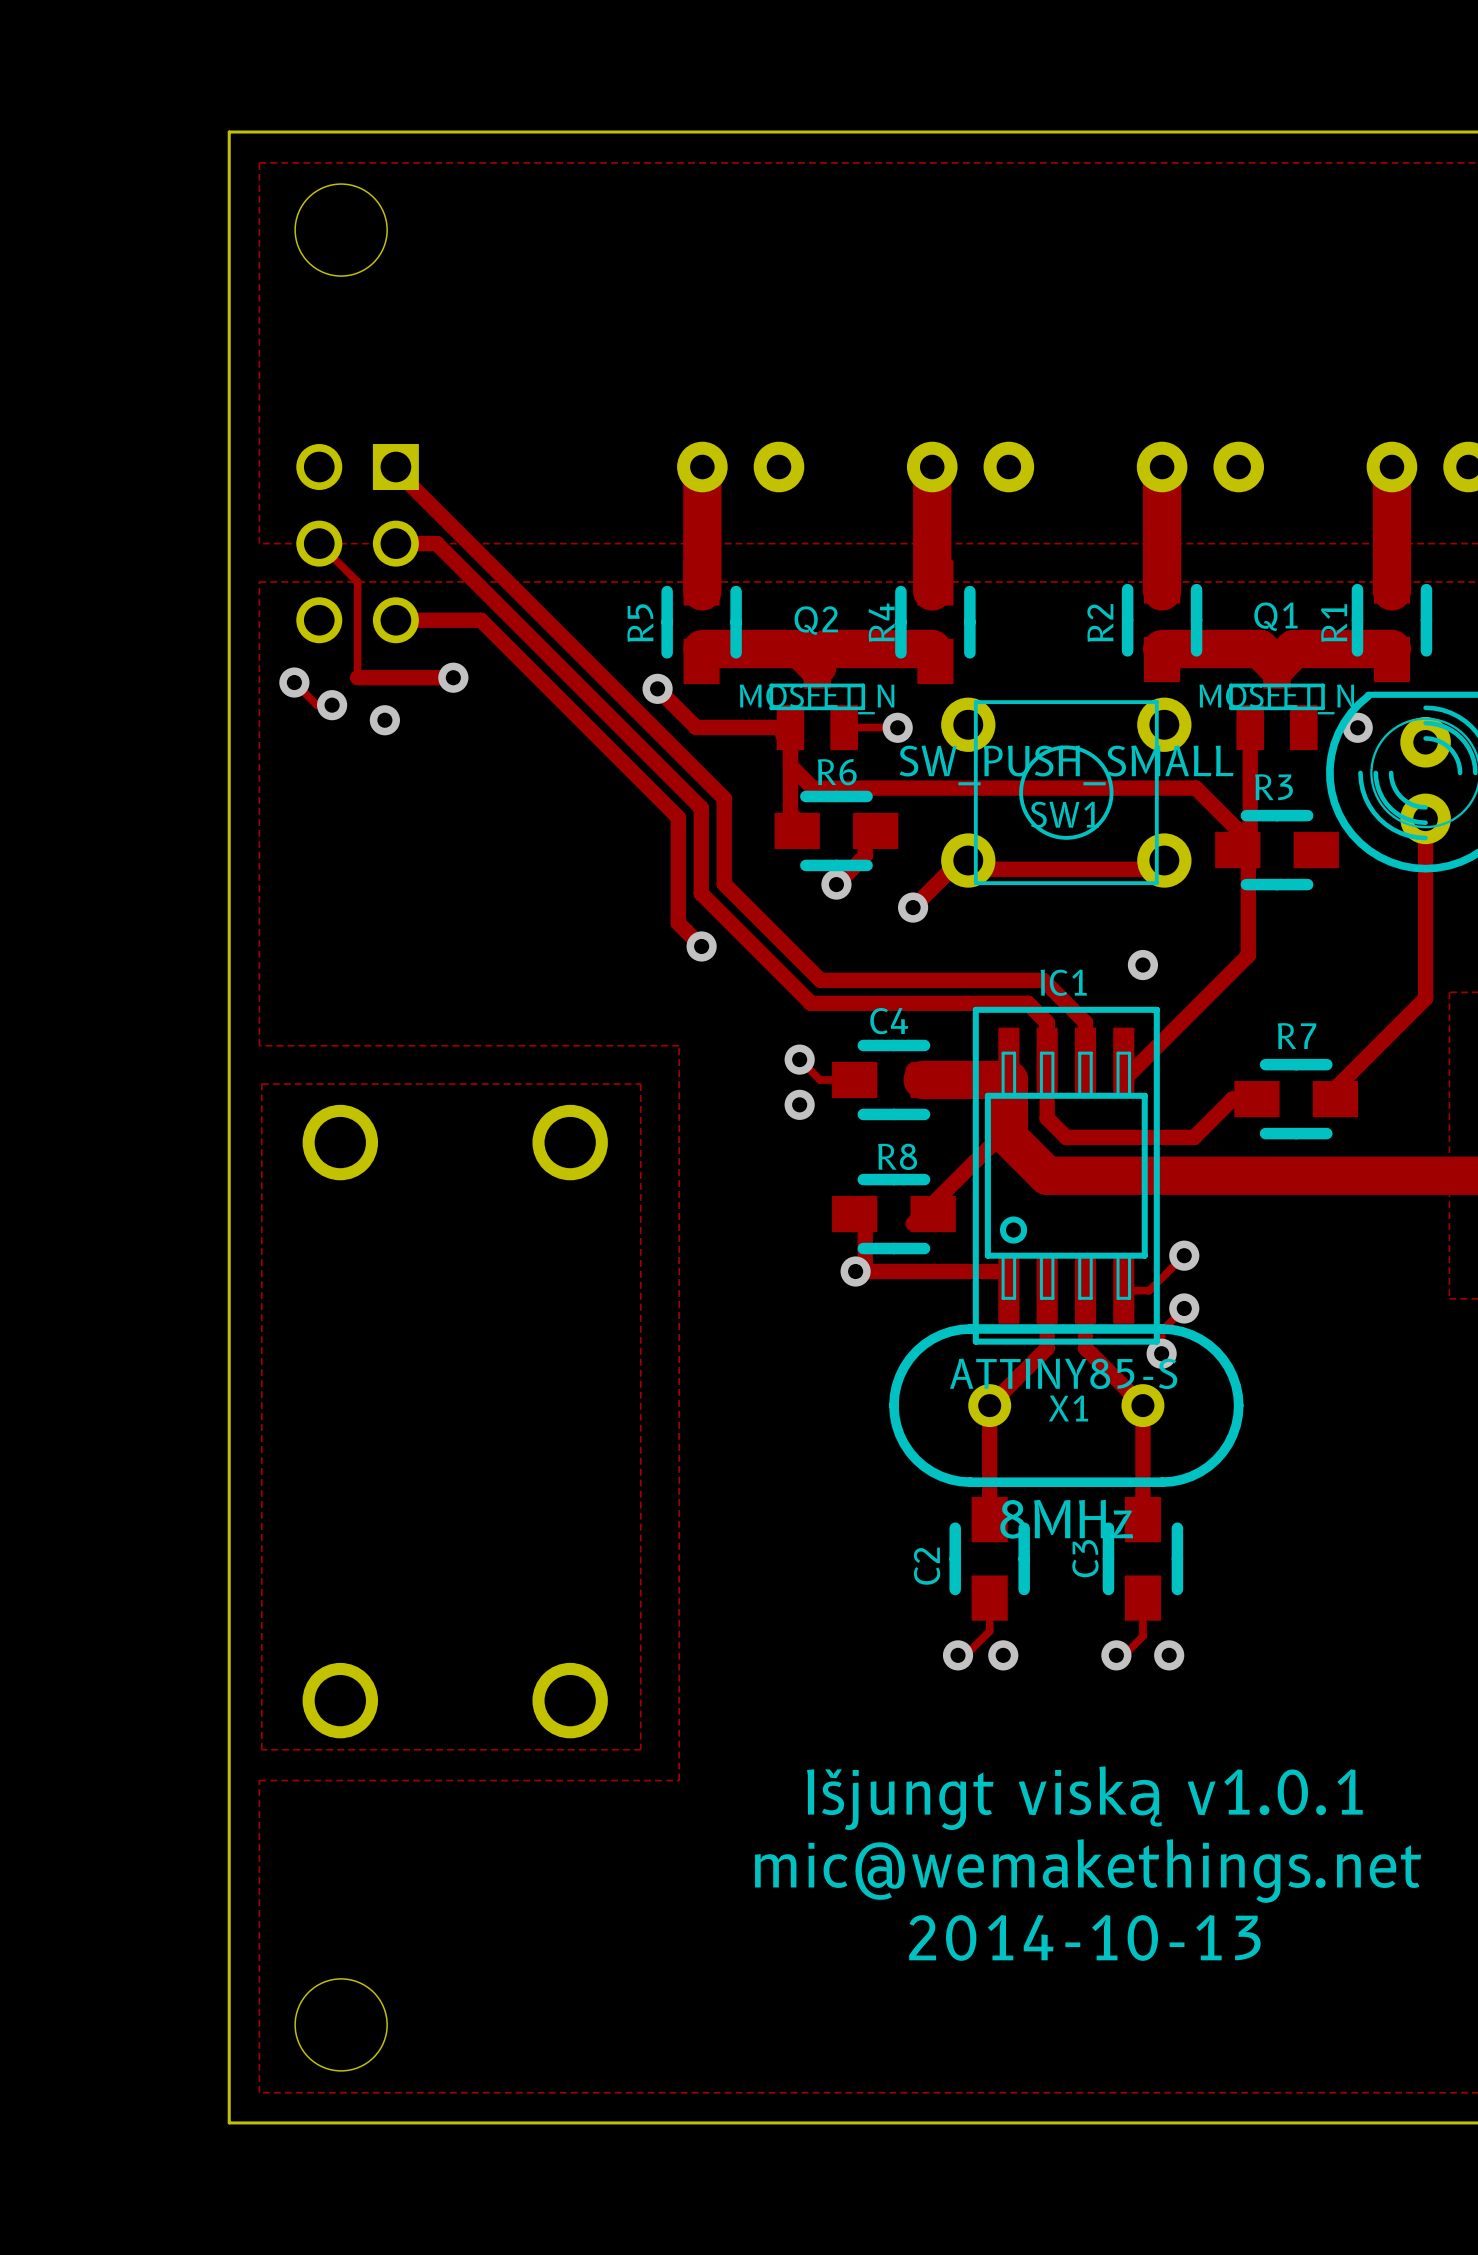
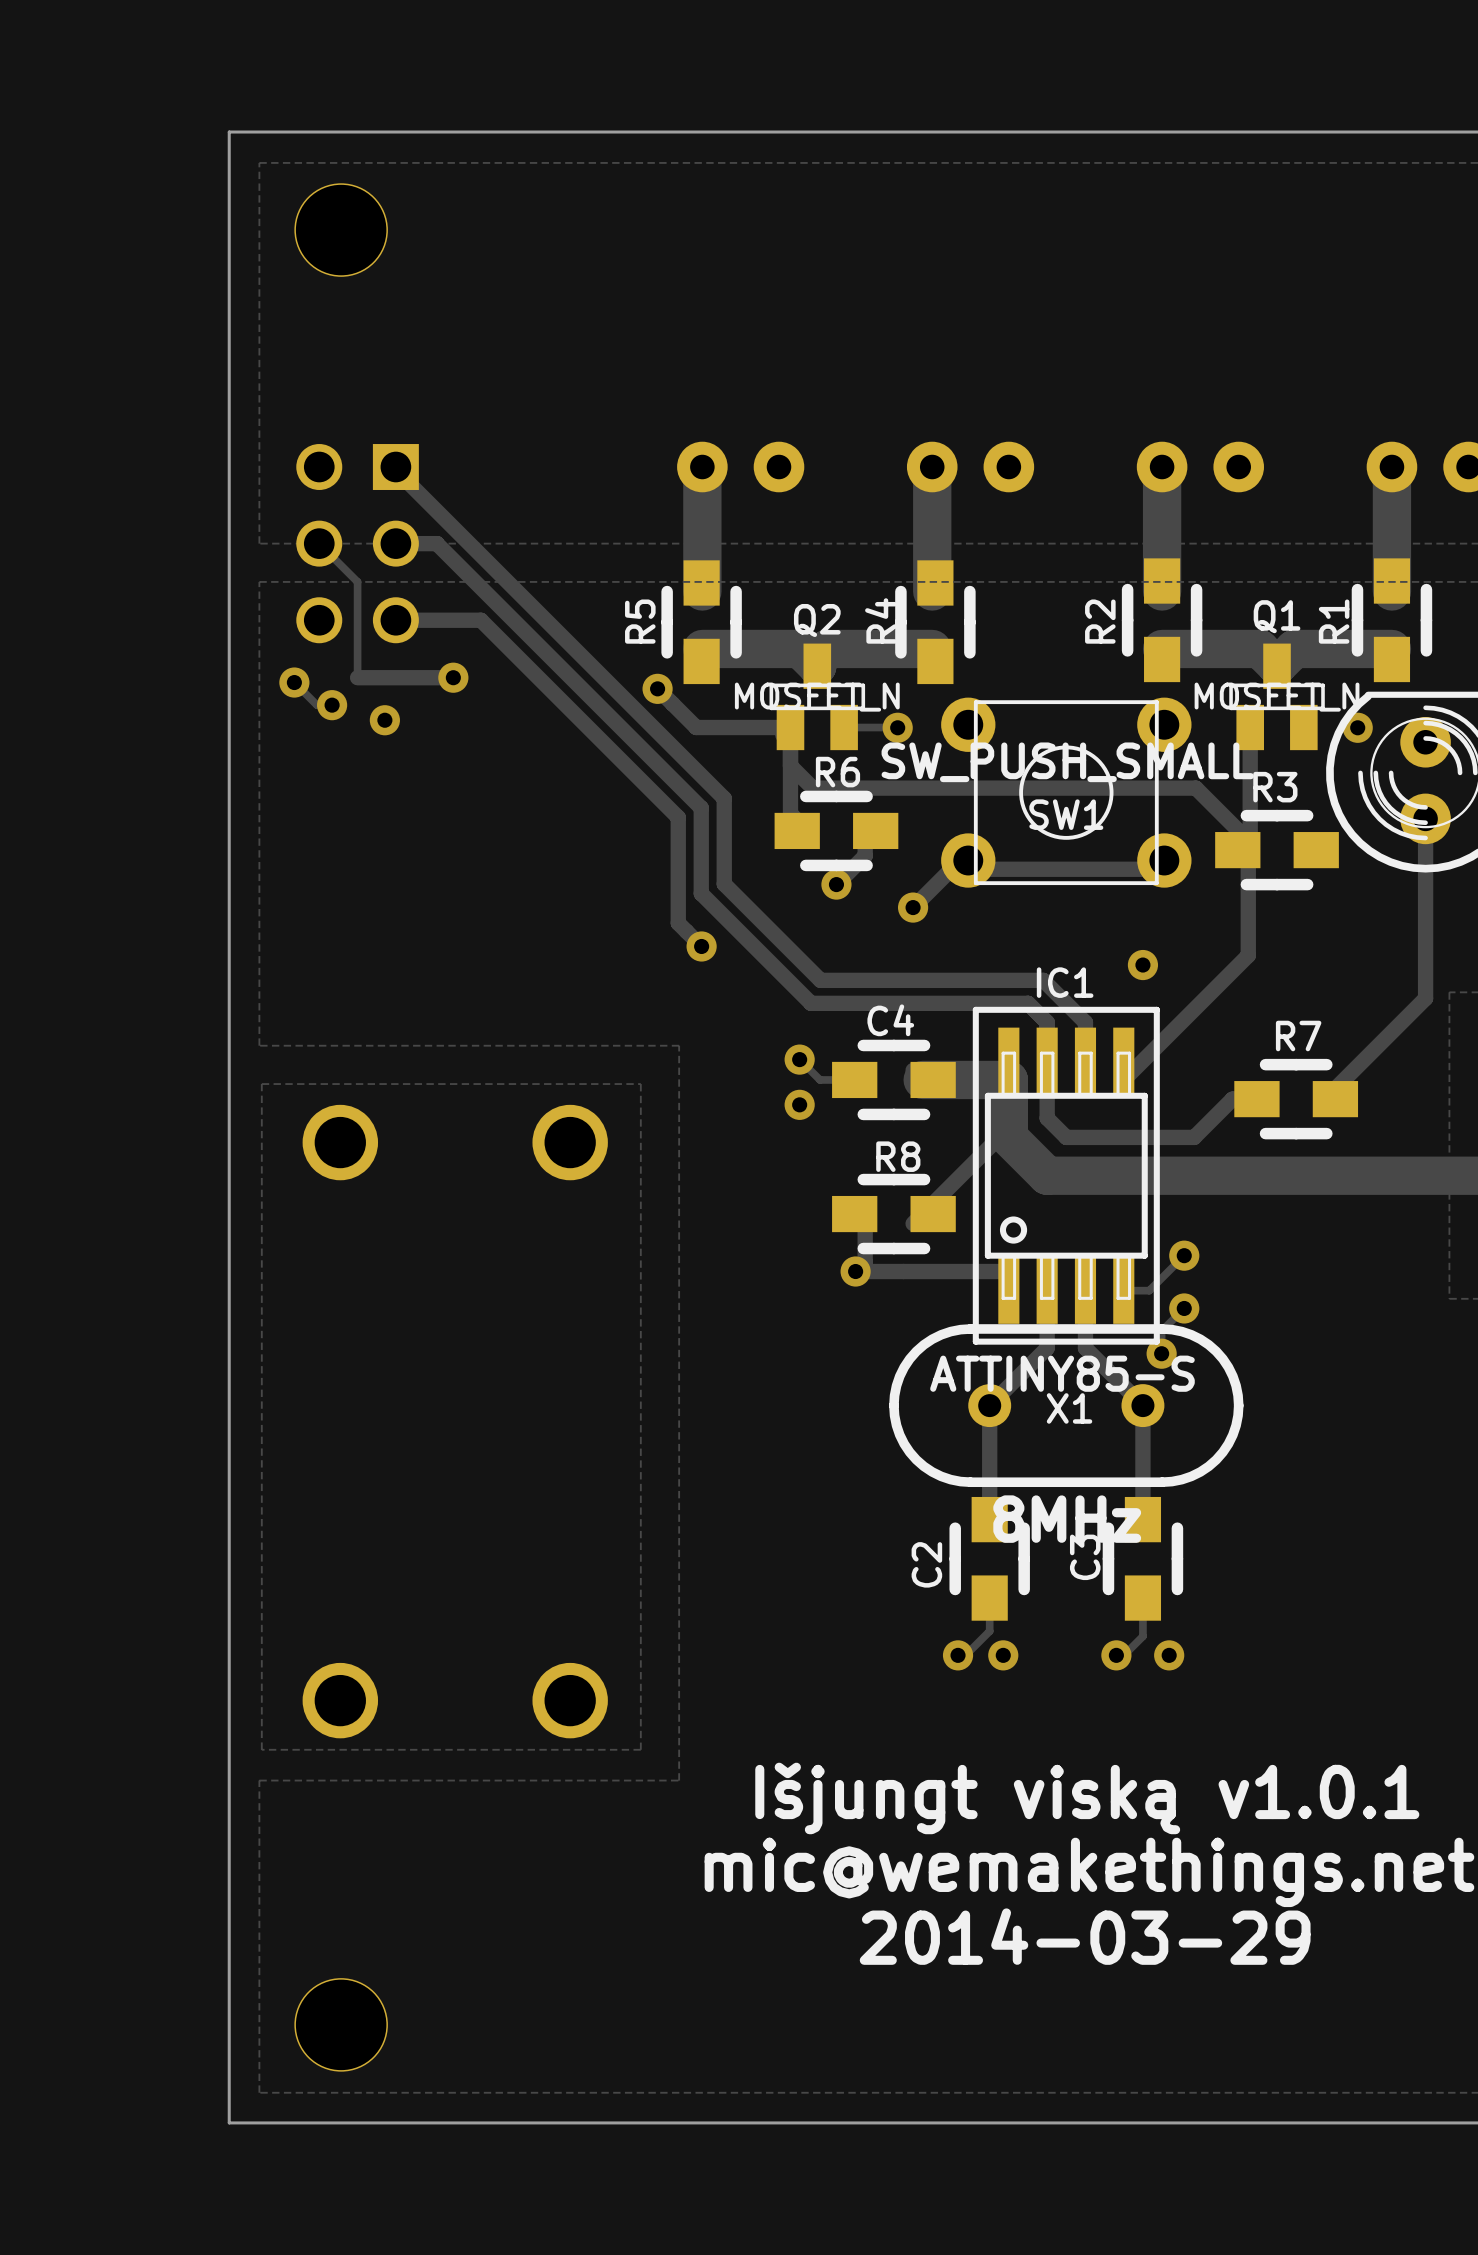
text: 2014-10-13 (1084, 1937) -> 2014-03-29 (1085, 1936)

